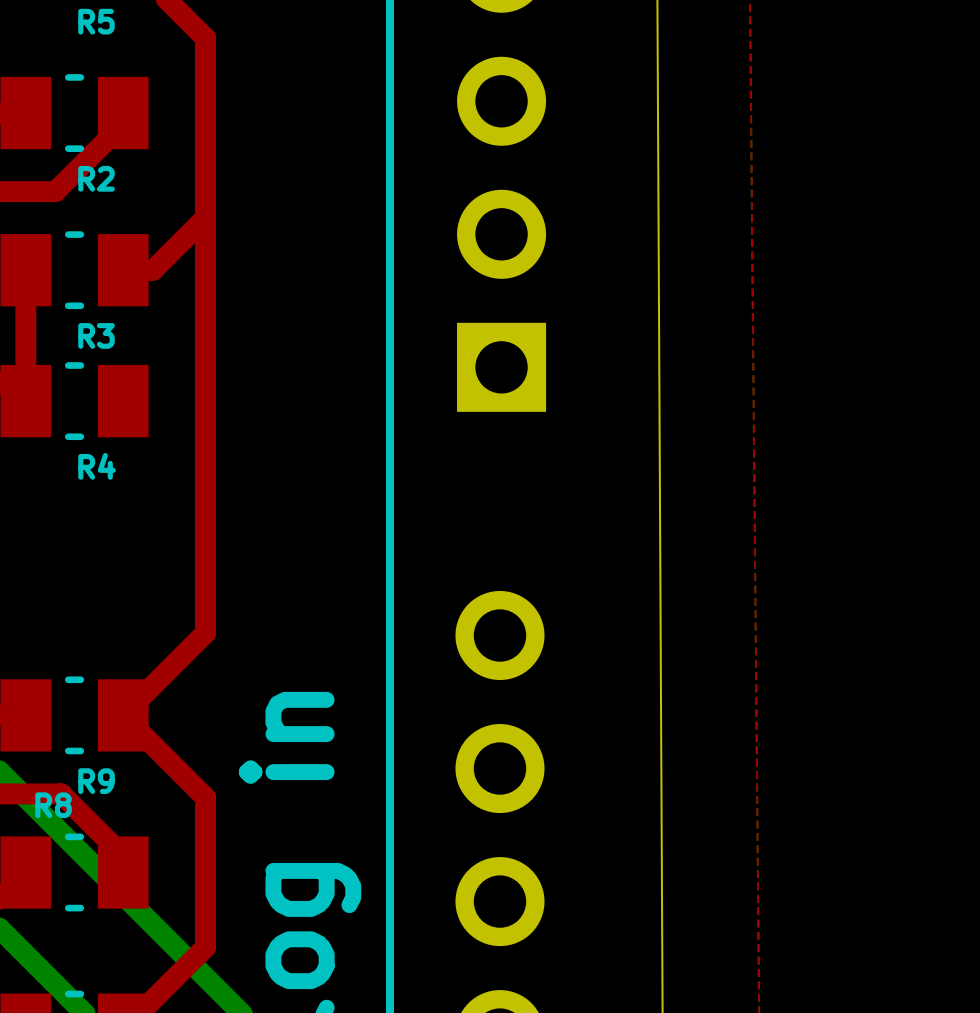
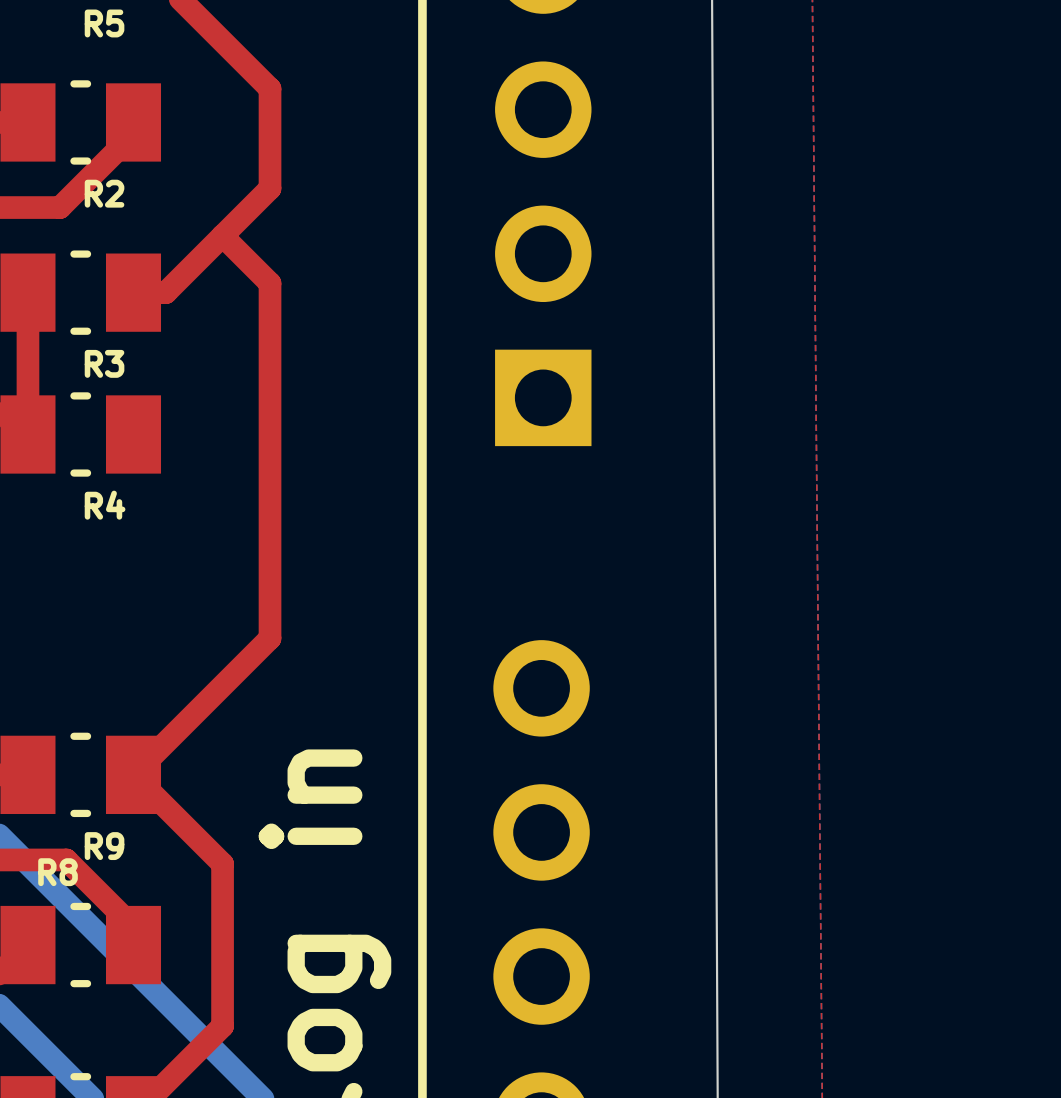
top track: (205, 38) (205, 633) -> (222, 41) (270, 88) (270, 188) (222, 235) (270, 283) (270, 638) (222, 685)

